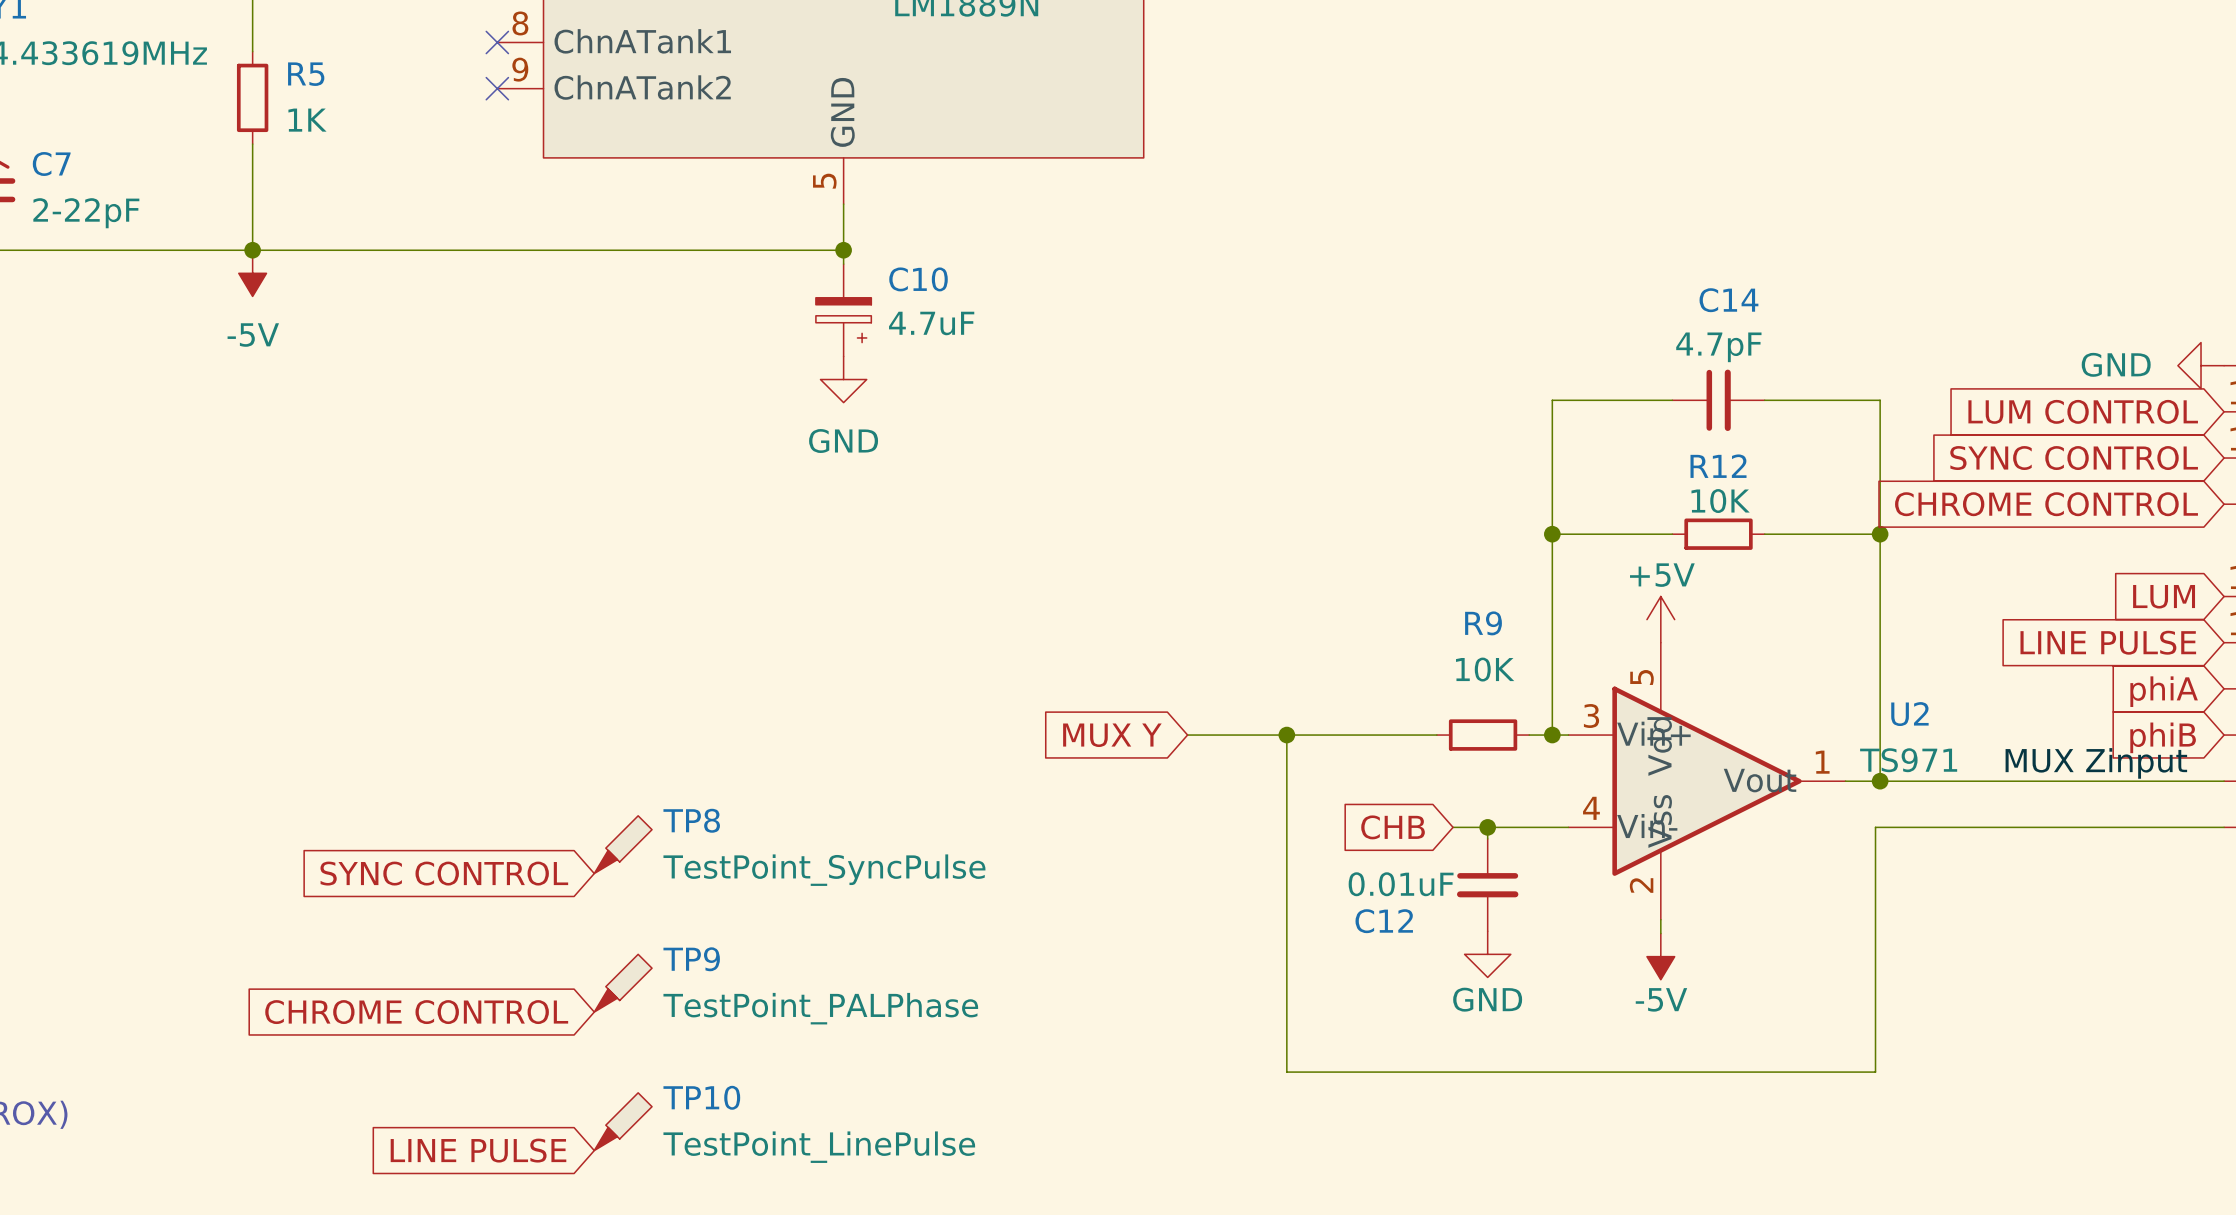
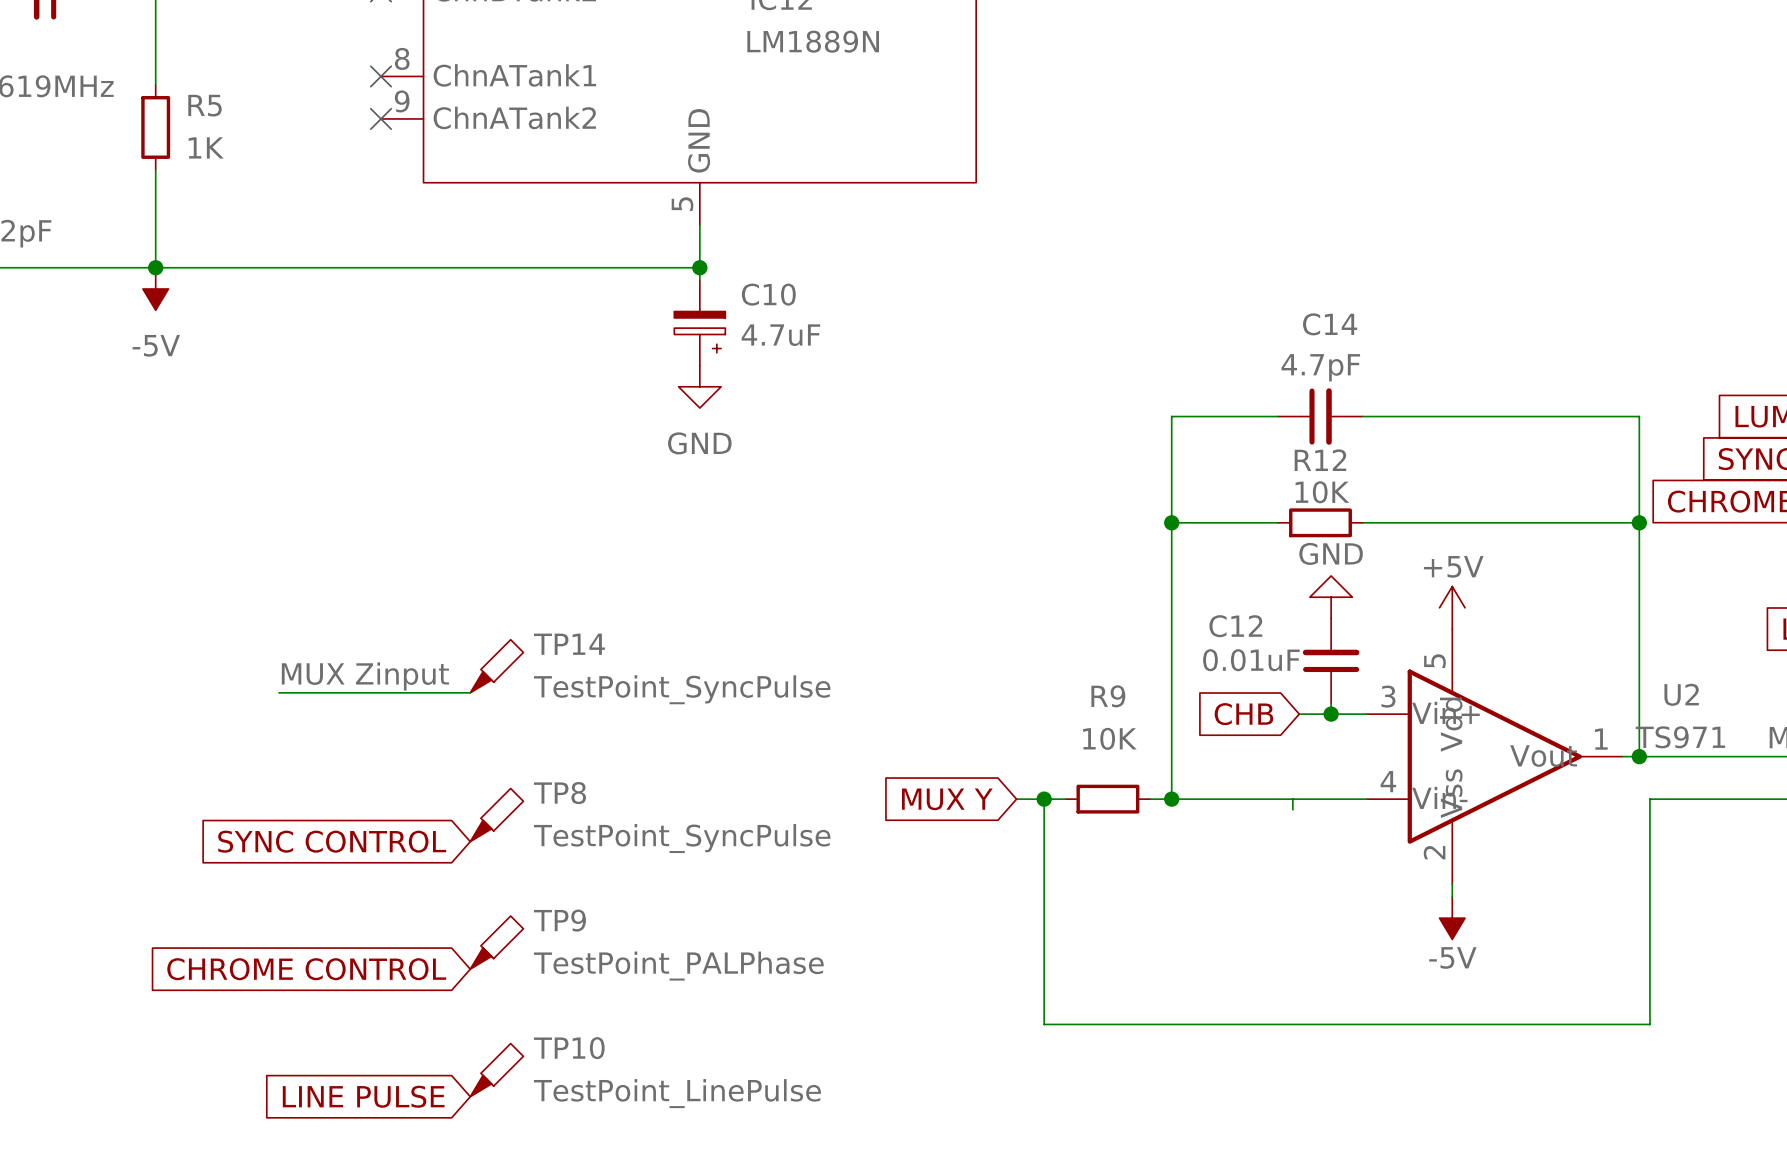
wire: (1672, 400) (1552, 400) (1552, 735) -> none
C14 position: (1718, 400) -> (1320, 416)
wire: (1764, 400) (1880, 400) (1880, 781) -> none
wire: none -> (1277, 416) (1171, 416) (1171, 799)
wire: none -> (1363, 416) (1639, 416) (1639, 756)
junction: none -> (1171, 522)
wire: none -> (1363, 522) (1639, 522)
wire: (1552, 534) (1672, 534) -> (1150, 799) (1260, 799)
junction: (1552, 534) -> none
R12 position: (1718, 534) -> (1320, 522)
wire: (1764, 534) (1880, 534) -> (1171, 522) (1277, 522)
junction position: (1880, 534) -> (1639, 522)
TP14: none -> TestPoint_SyncPulse (496, 666)
label: none -> MUX Zinput (365, 676)
wire: none -> (278, 692) (470, 692)
wire: none -> (1331, 703) (1331, 714) (1299, 714)
global label position: MUX Y (1112, 735) -> MUX Y (947, 799)
wire: (1187, 735) (1436, 735) -> none
wire: (1286, 735) (1286, 1072) -> (1044, 799) (1044, 1024) (1107, 1024)
junction: (1286, 735) -> none
R9 position: (1483, 735) -> (1107, 799)
junction position: (1552, 735) -> (1331, 714)
junction position: (1880, 781) -> (1639, 756)
wire: none -> (1016, 799) (1065, 799)
junction: none -> (1044, 799)
junction: none -> (1171, 799)
global label position: CHB (1393, 827) -> CHB (1243, 714)
junction: (1487, 827) -> none
C12 rotation: 0° (1487, 885) -> 180° (1331, 660)
C12 position: (1487, 885) -> (1331, 660)
C12 name position: C12 (1384, 921) -> C12 (1235, 626)
power symbol rotation: 0° (1487, 954) -> 180° (1331, 597)
power symbol position: GND (1487, 954) -> GND (1331, 597)

